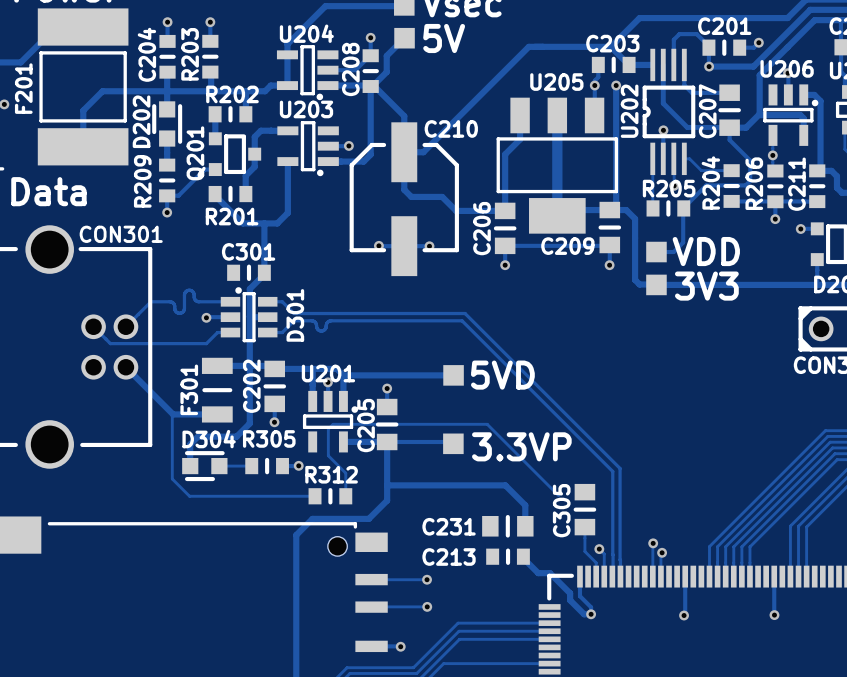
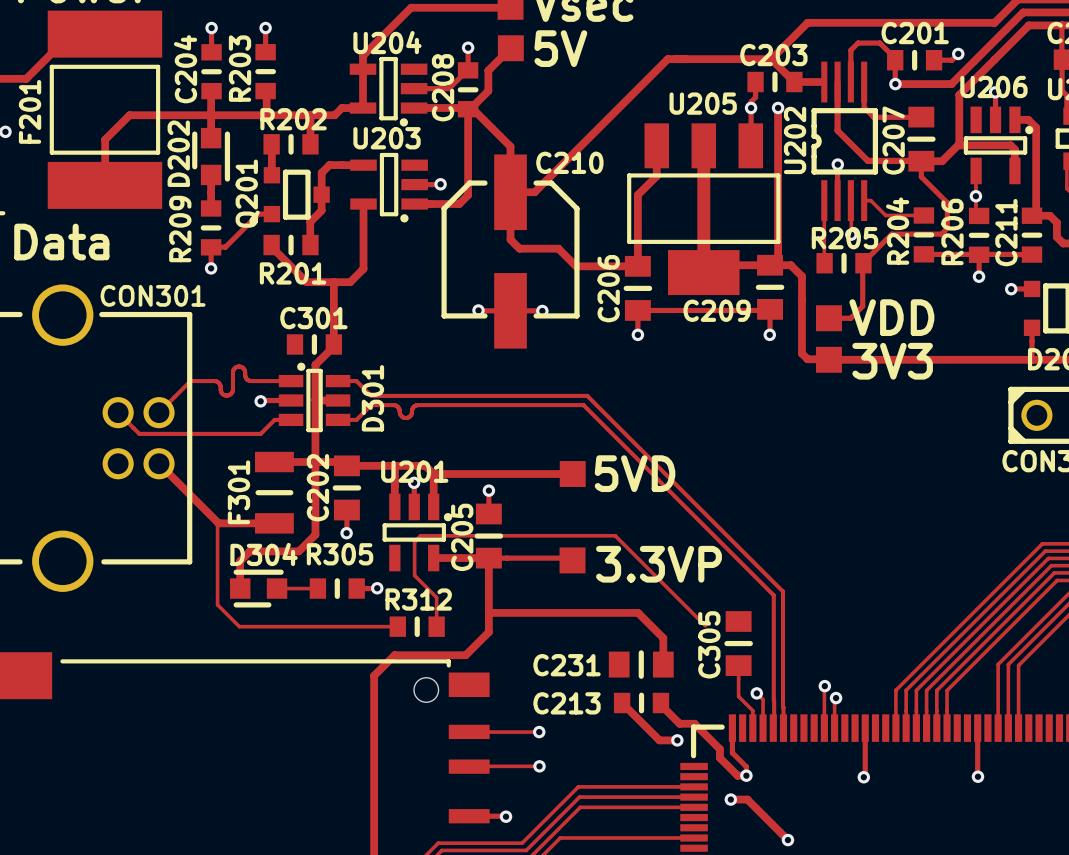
track: none -> (622, 703) (659, 740) (677, 740)
via: none -> (677, 740)
track: none -> (730, 799) (747, 799) (787, 840)
via: none -> (730, 799)
via: none -> (787, 840)

